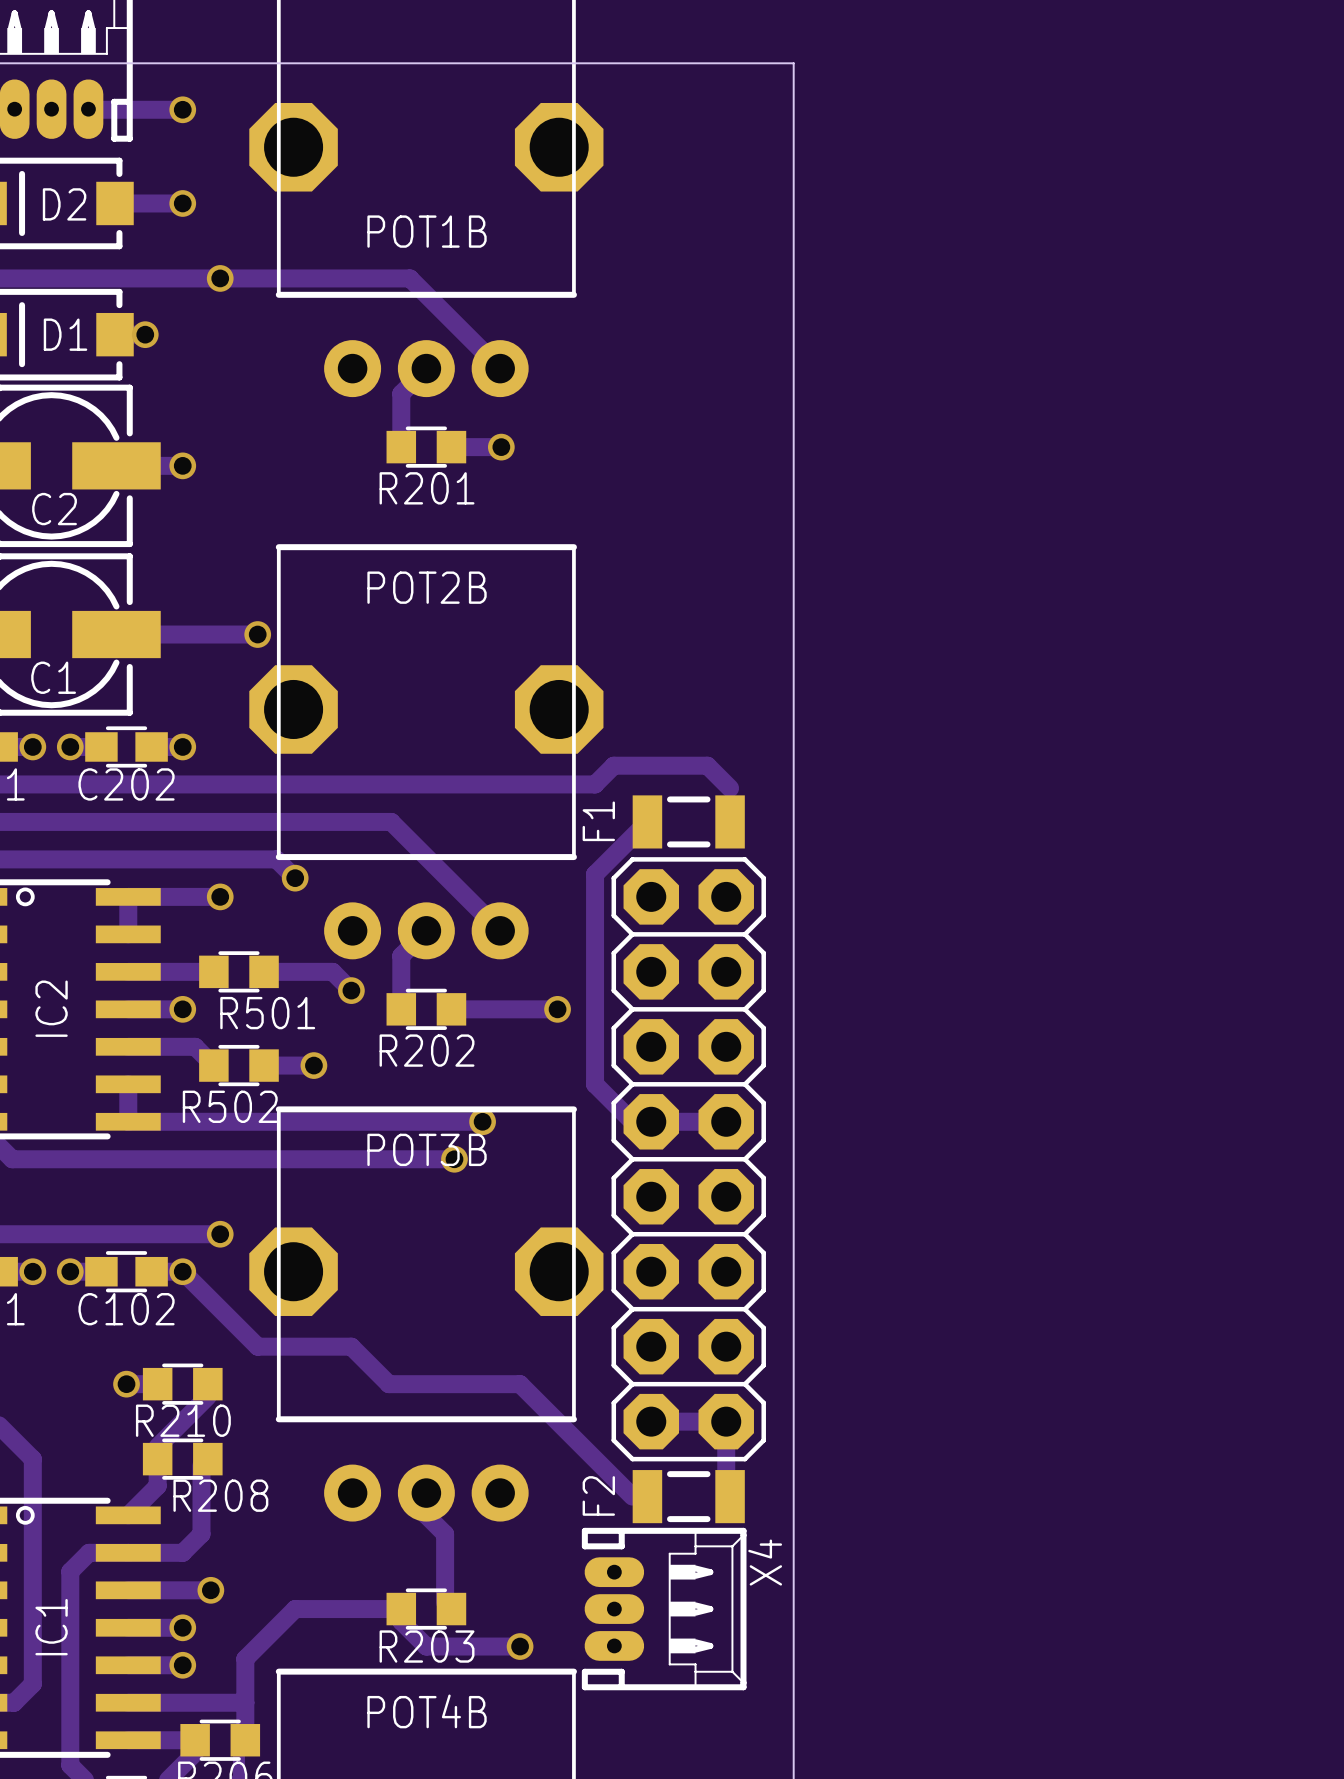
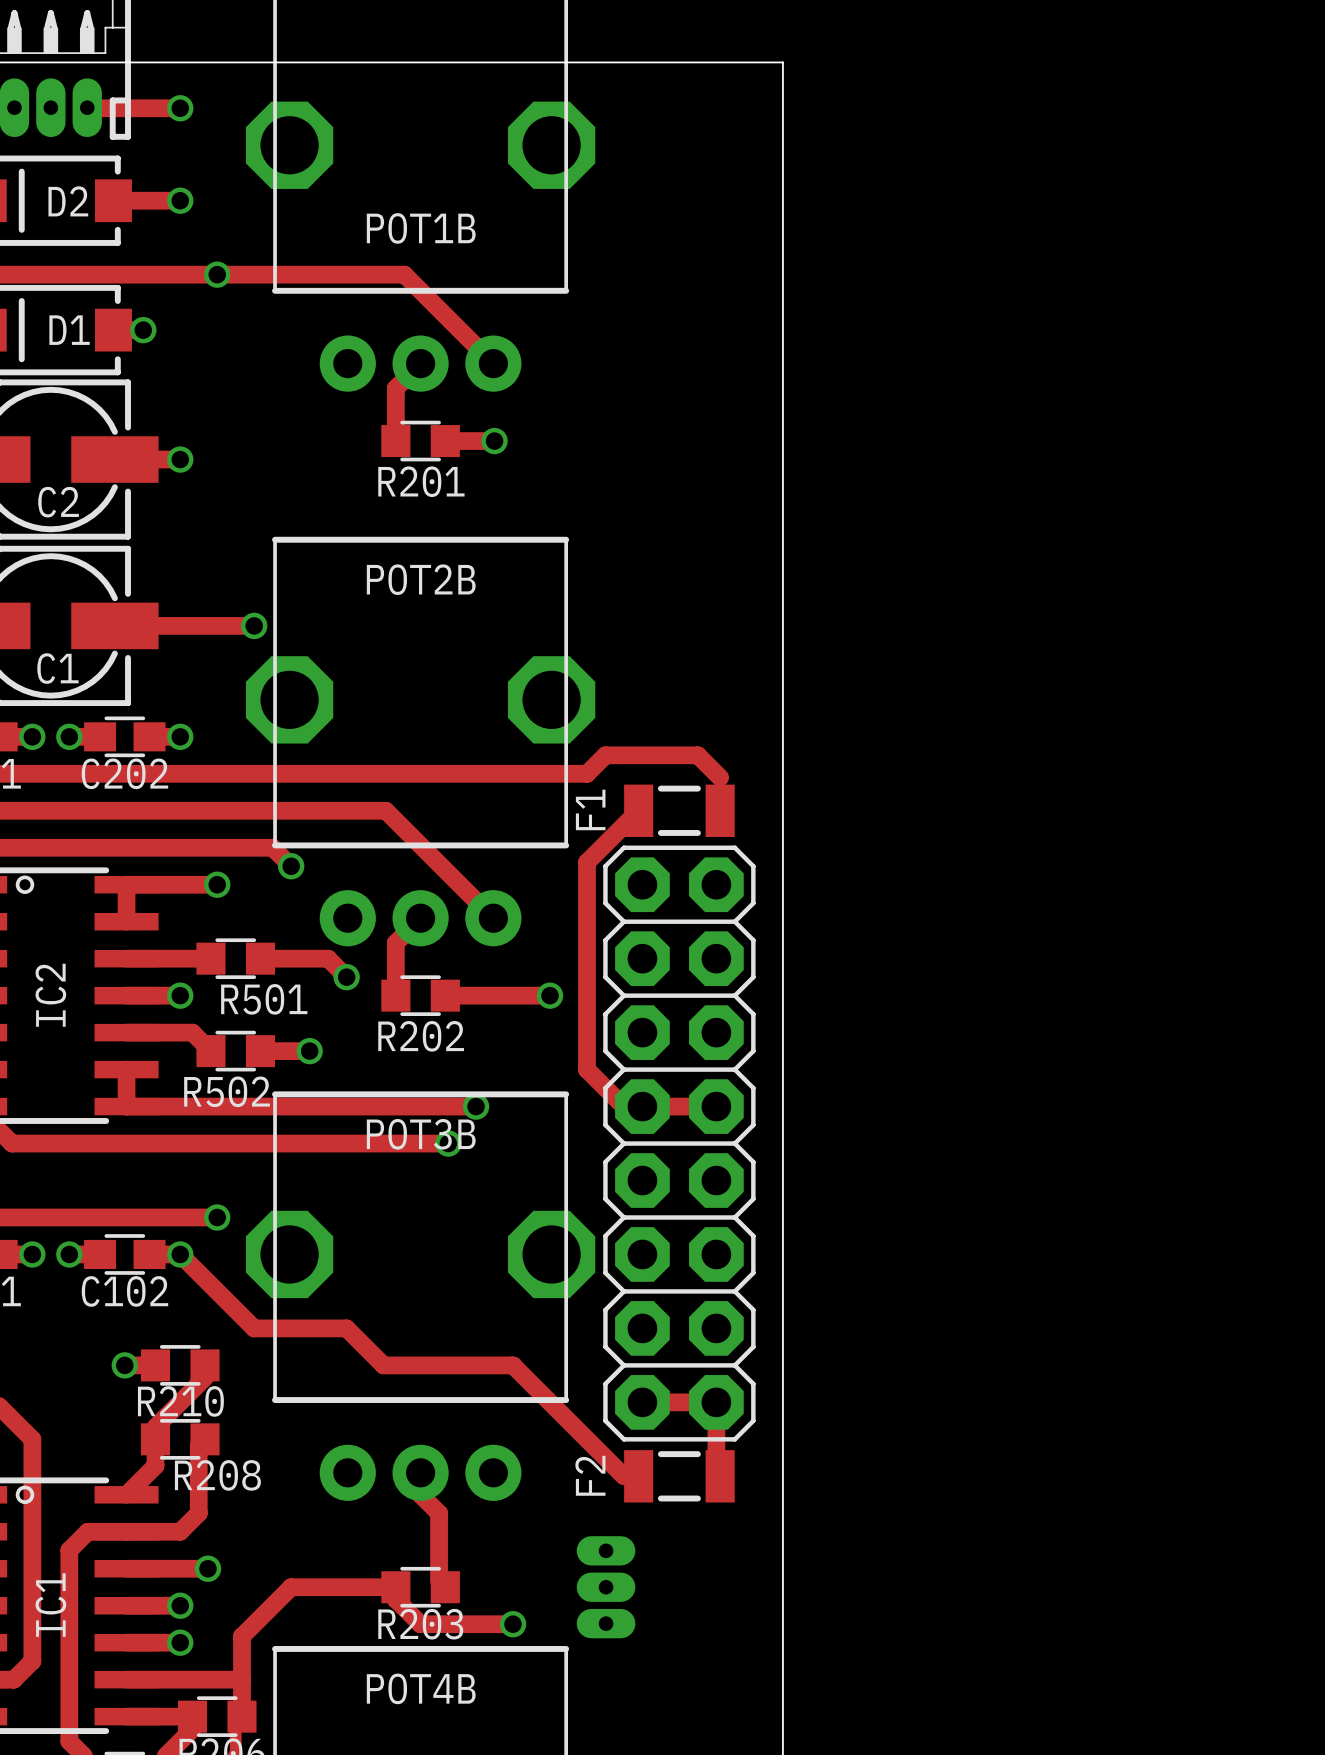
X4: (664, 1609) -> none

